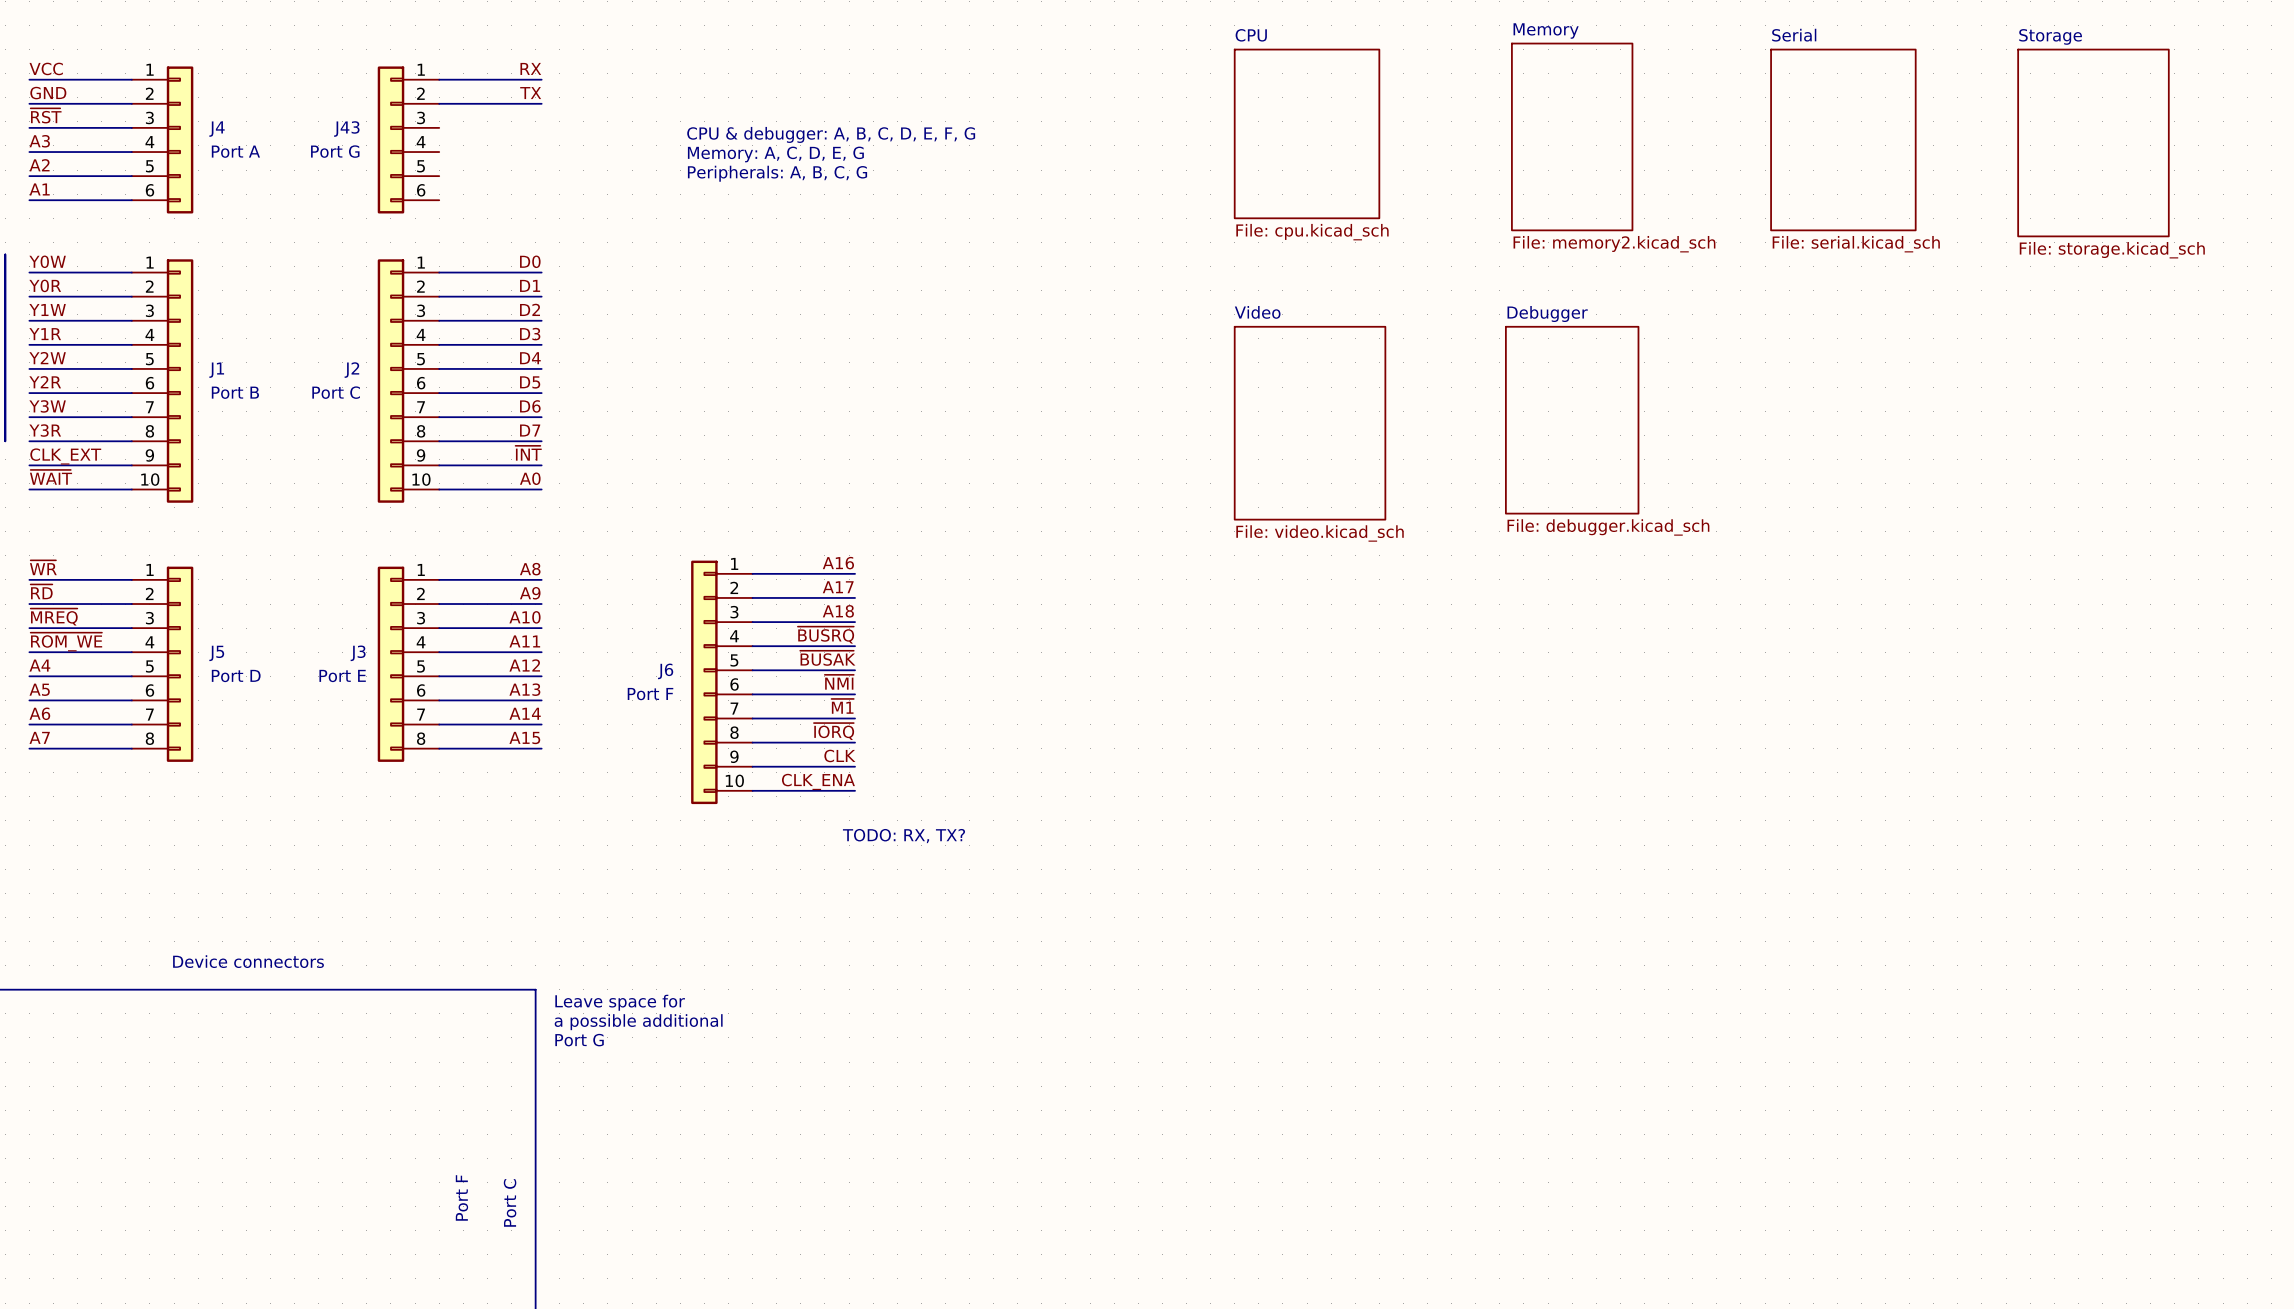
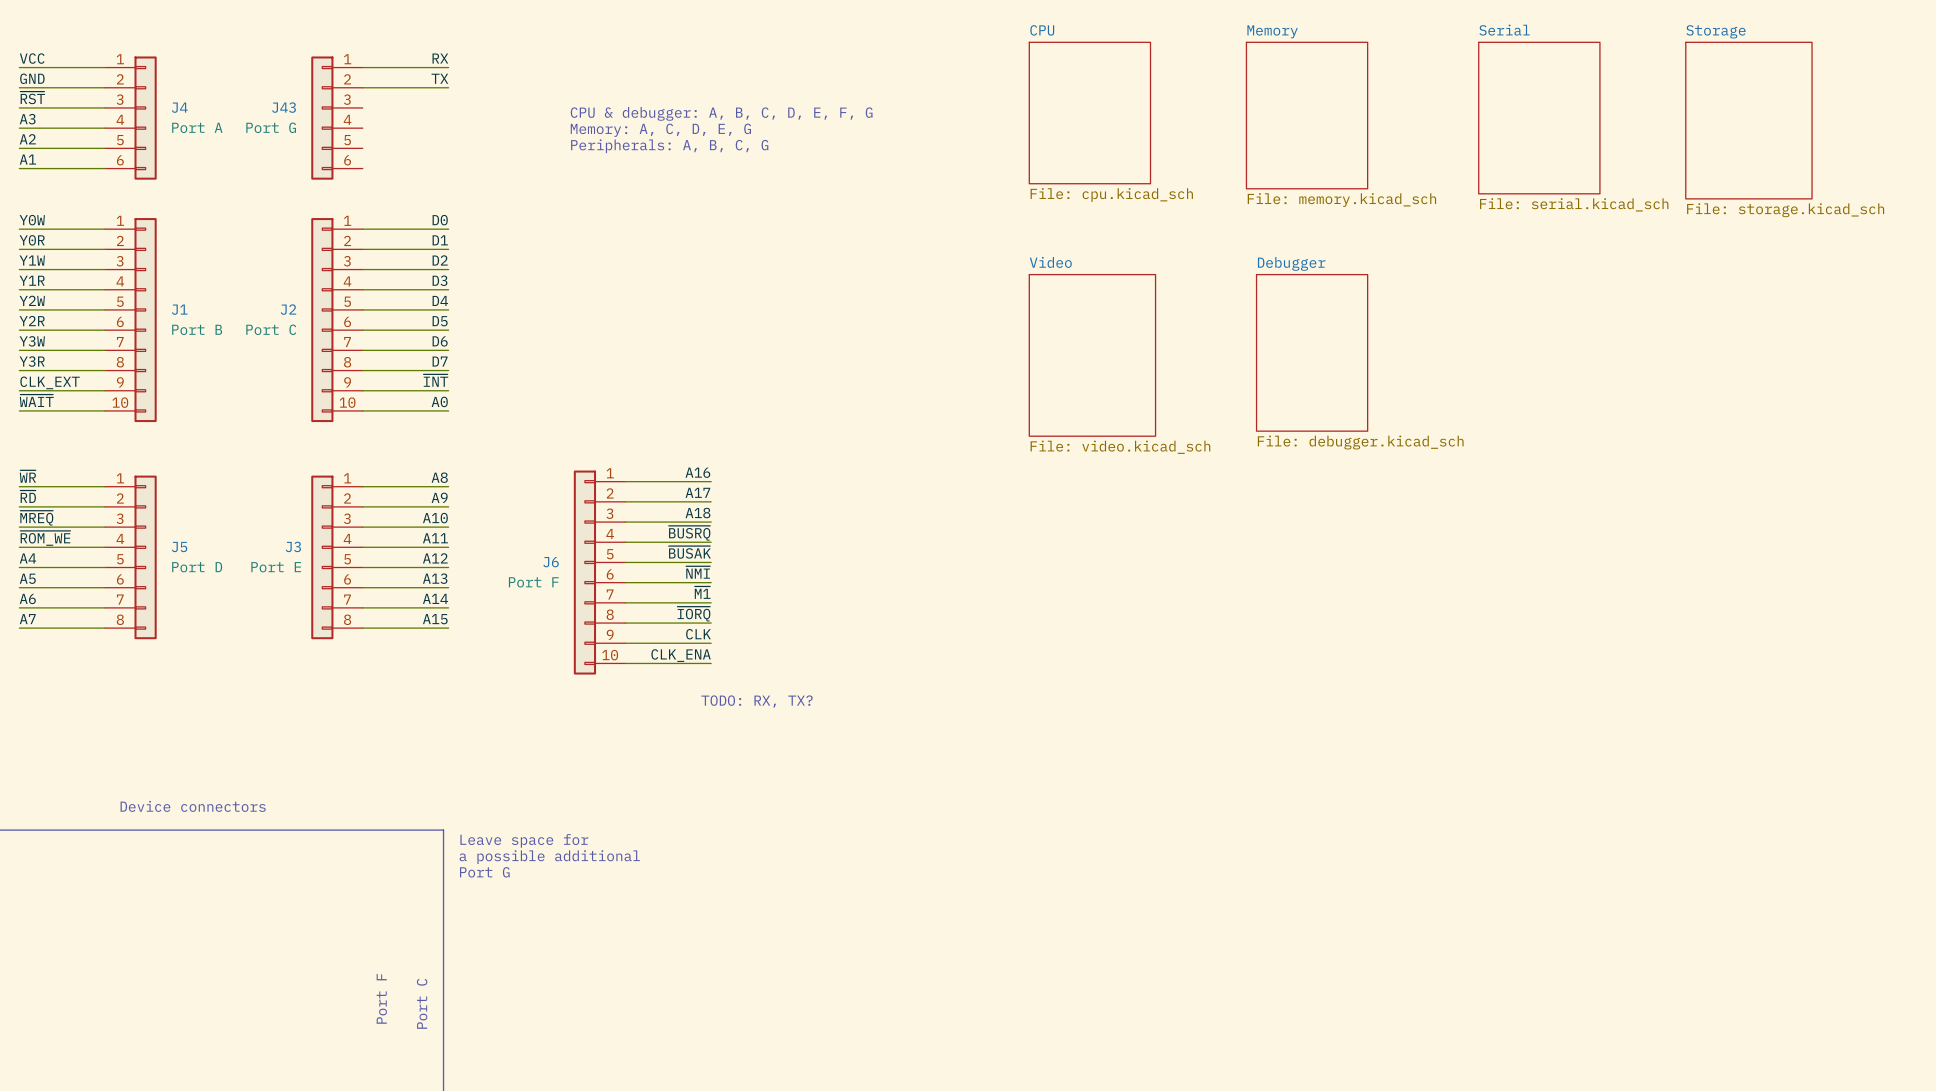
sheet Memory shape: [1511, 42, 1634, 232] -> [1245, 41, 1369, 190]
sheet Memory value: File: memory2.kicad_sch (1614, 244) -> File: memory.kicad_sch (1341, 200)

